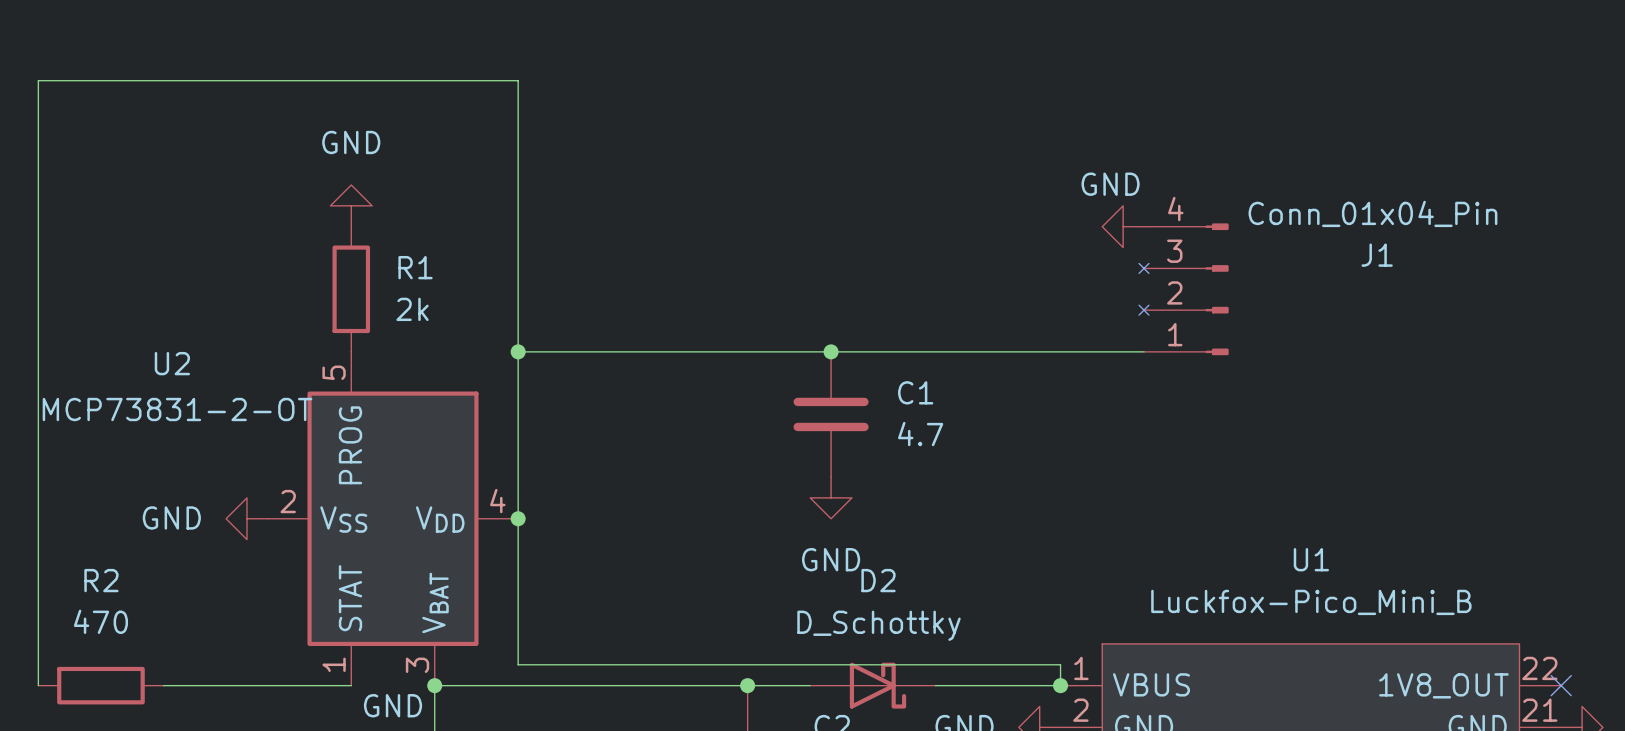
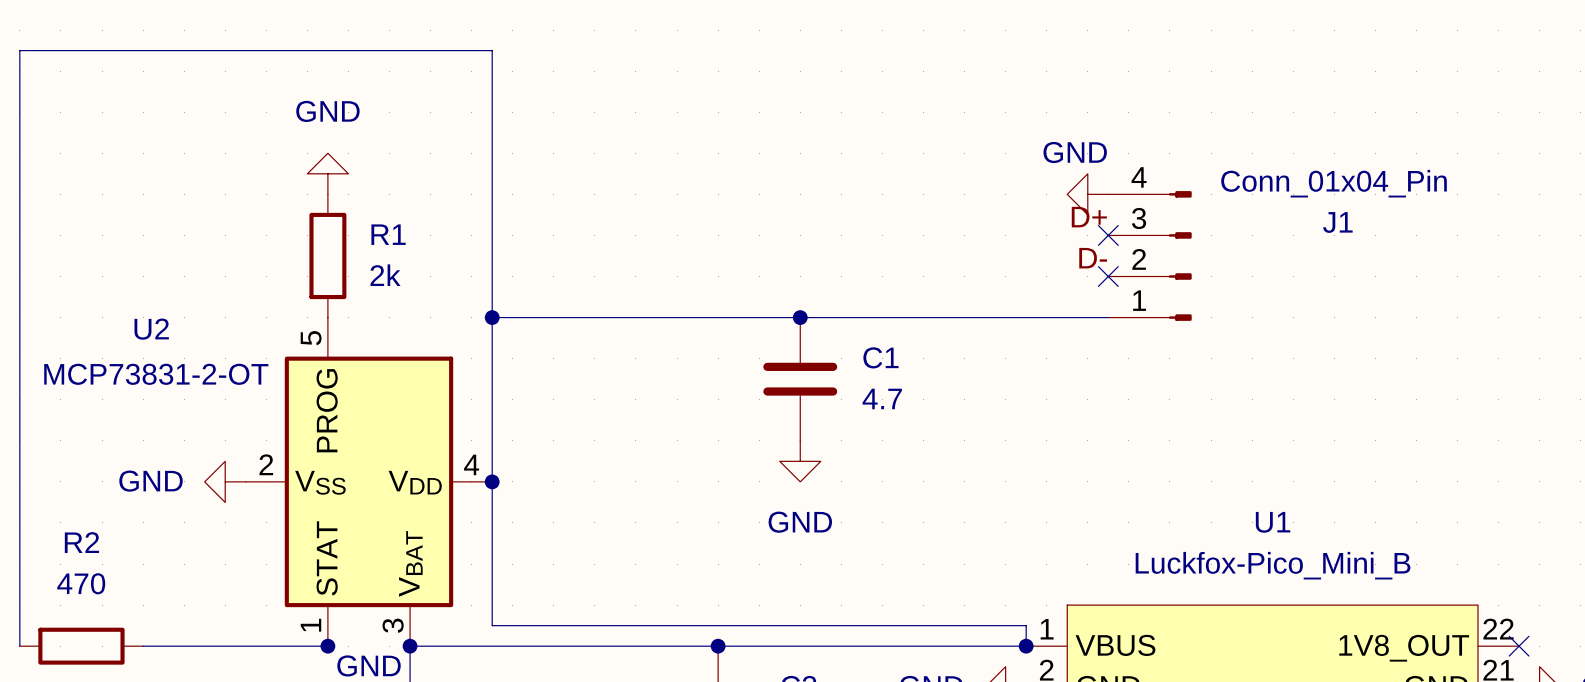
J1 symbol: [1139, 223, 1229, 356] -> [1108, 191, 1192, 321]
label: none -> D+ (1089, 217)
no-connect mark: none -> (1108, 235)
label: none -> D- (1093, 258)
no-connect mark: none -> (1108, 276)
junction: none -> (327, 646)
D2: D_Schottky (872, 685) -> none

